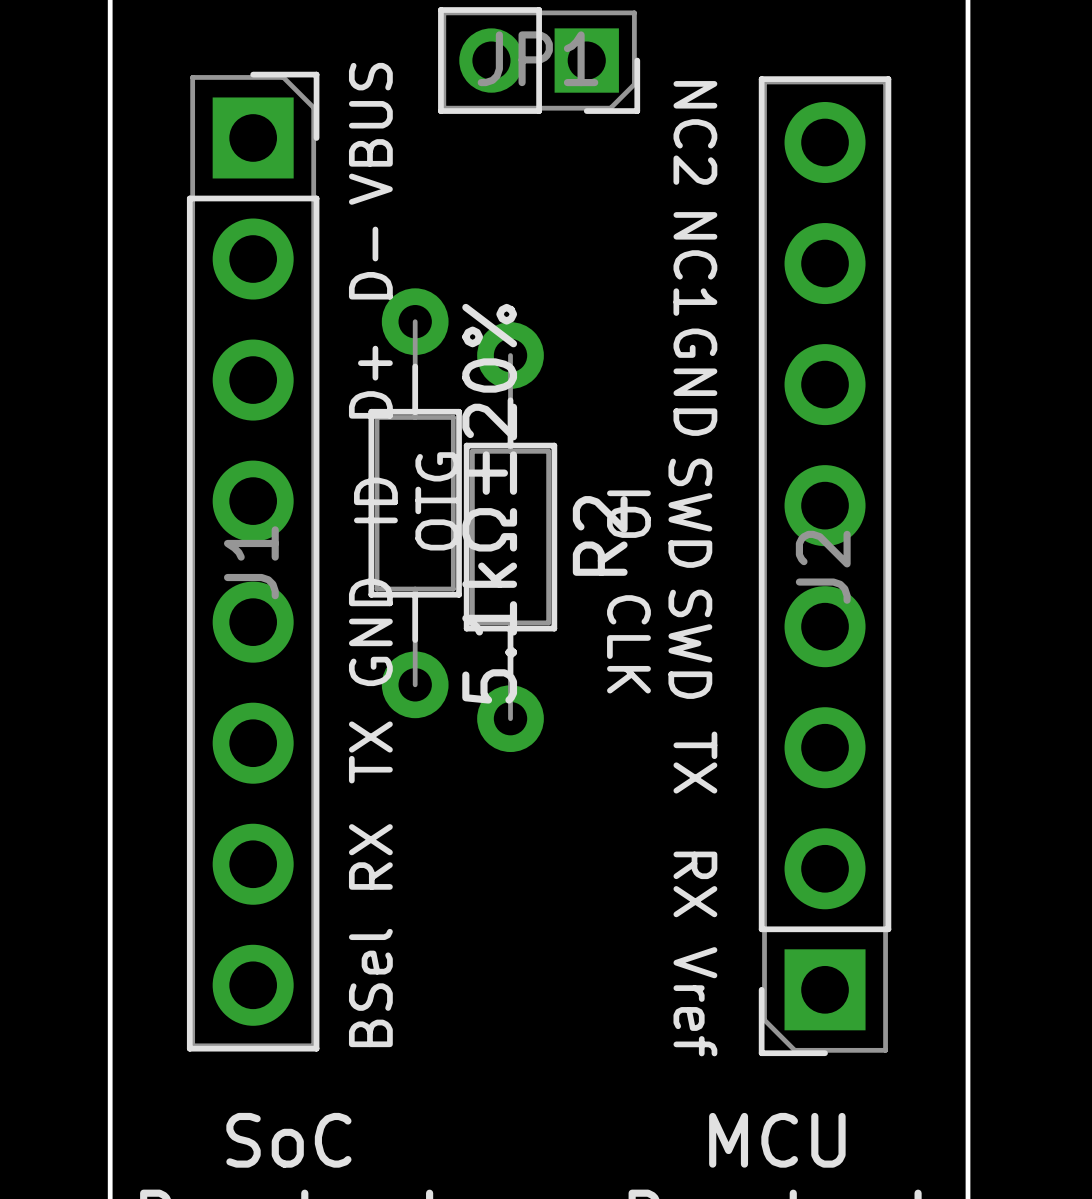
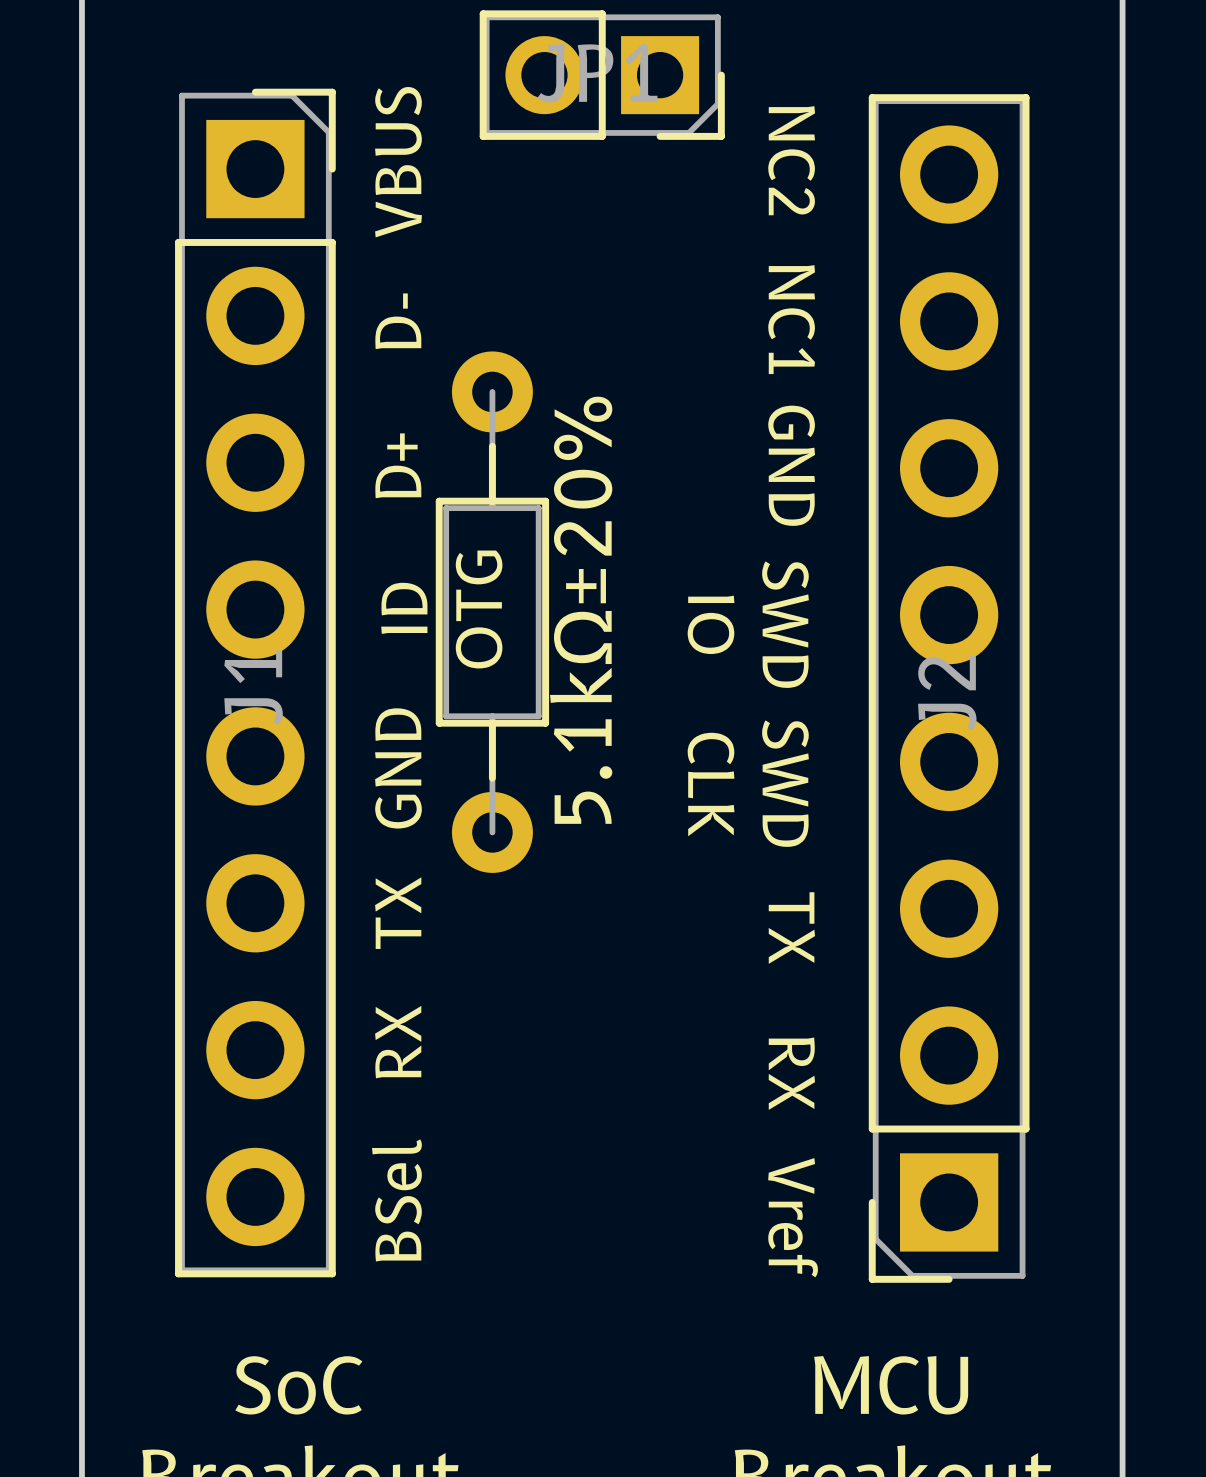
part position: (415, 503) -> (492, 612)
R2: (510, 537) -> none

